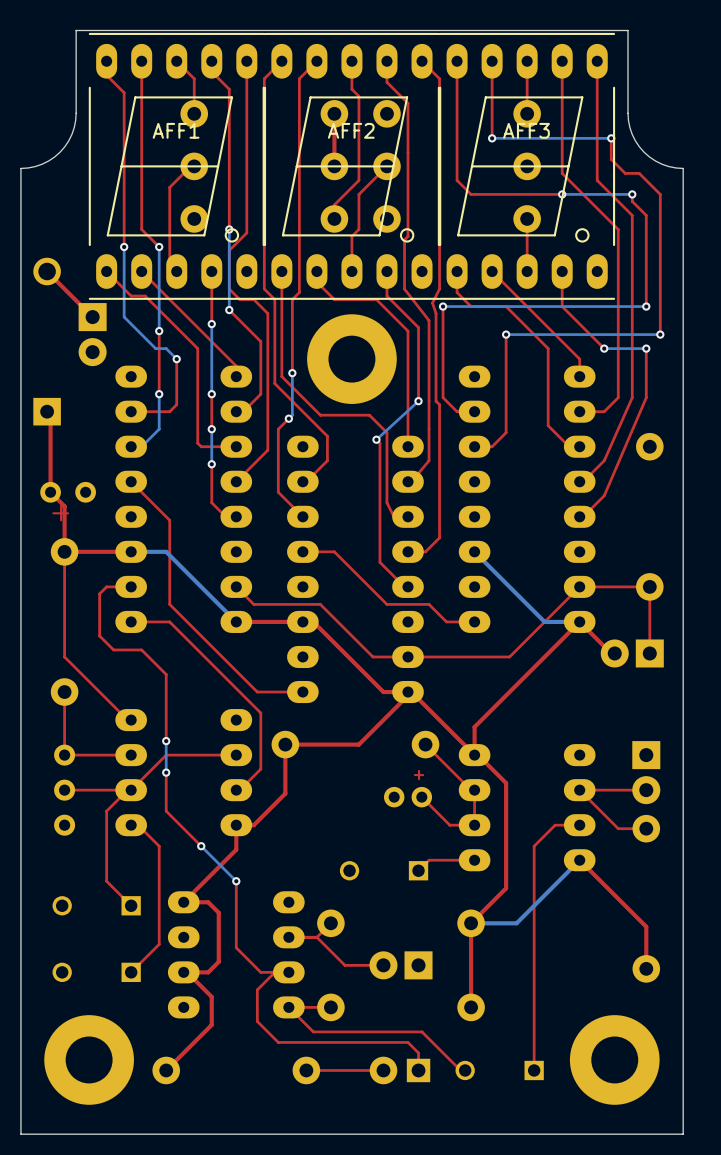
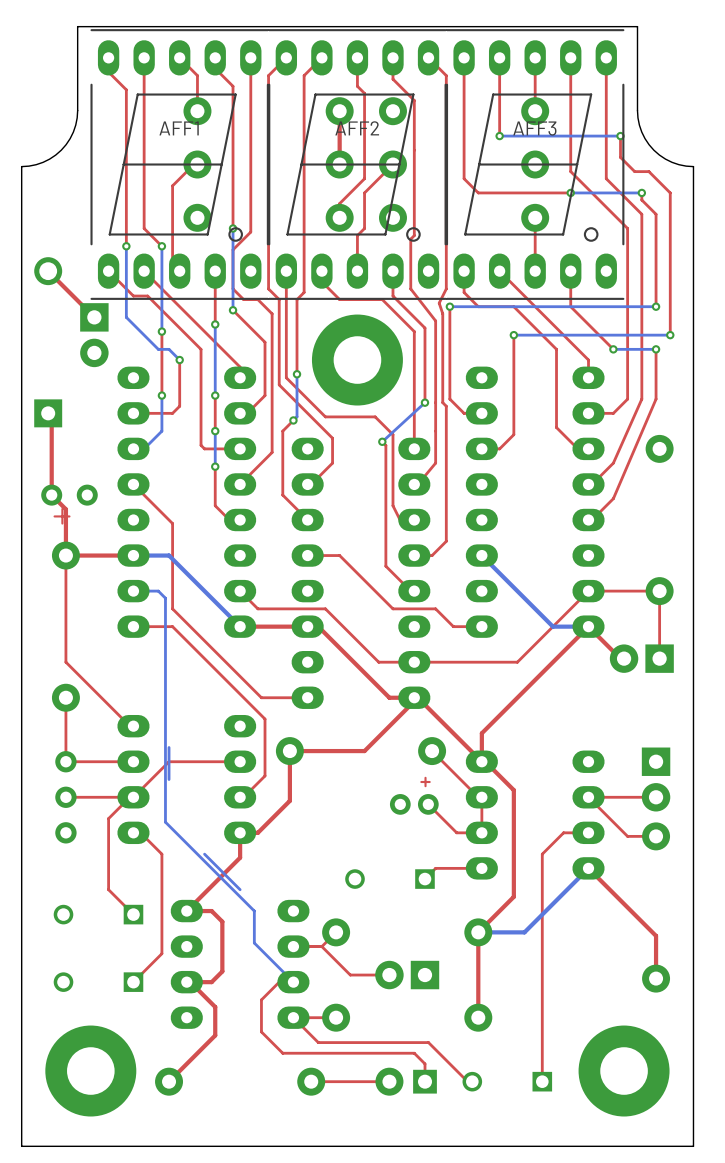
top track: (131, 586) (106, 586) (99, 593) (99, 635) (113, 649) (141, 649) (166, 674) (166, 741) -> none
bottom track: none -> (133, 591) (158, 591) (165, 598) (165, 822) (254, 911) (254, 943) (293, 982)
via: (166, 741) -> none
top track: (166, 772) (166, 811) (201, 846) -> none
via: (166, 772) -> none
via: (201, 846) -> none
top track: (236, 881) (236, 947) (260, 972) (274, 972) -> none
via: (236, 881) -> none

